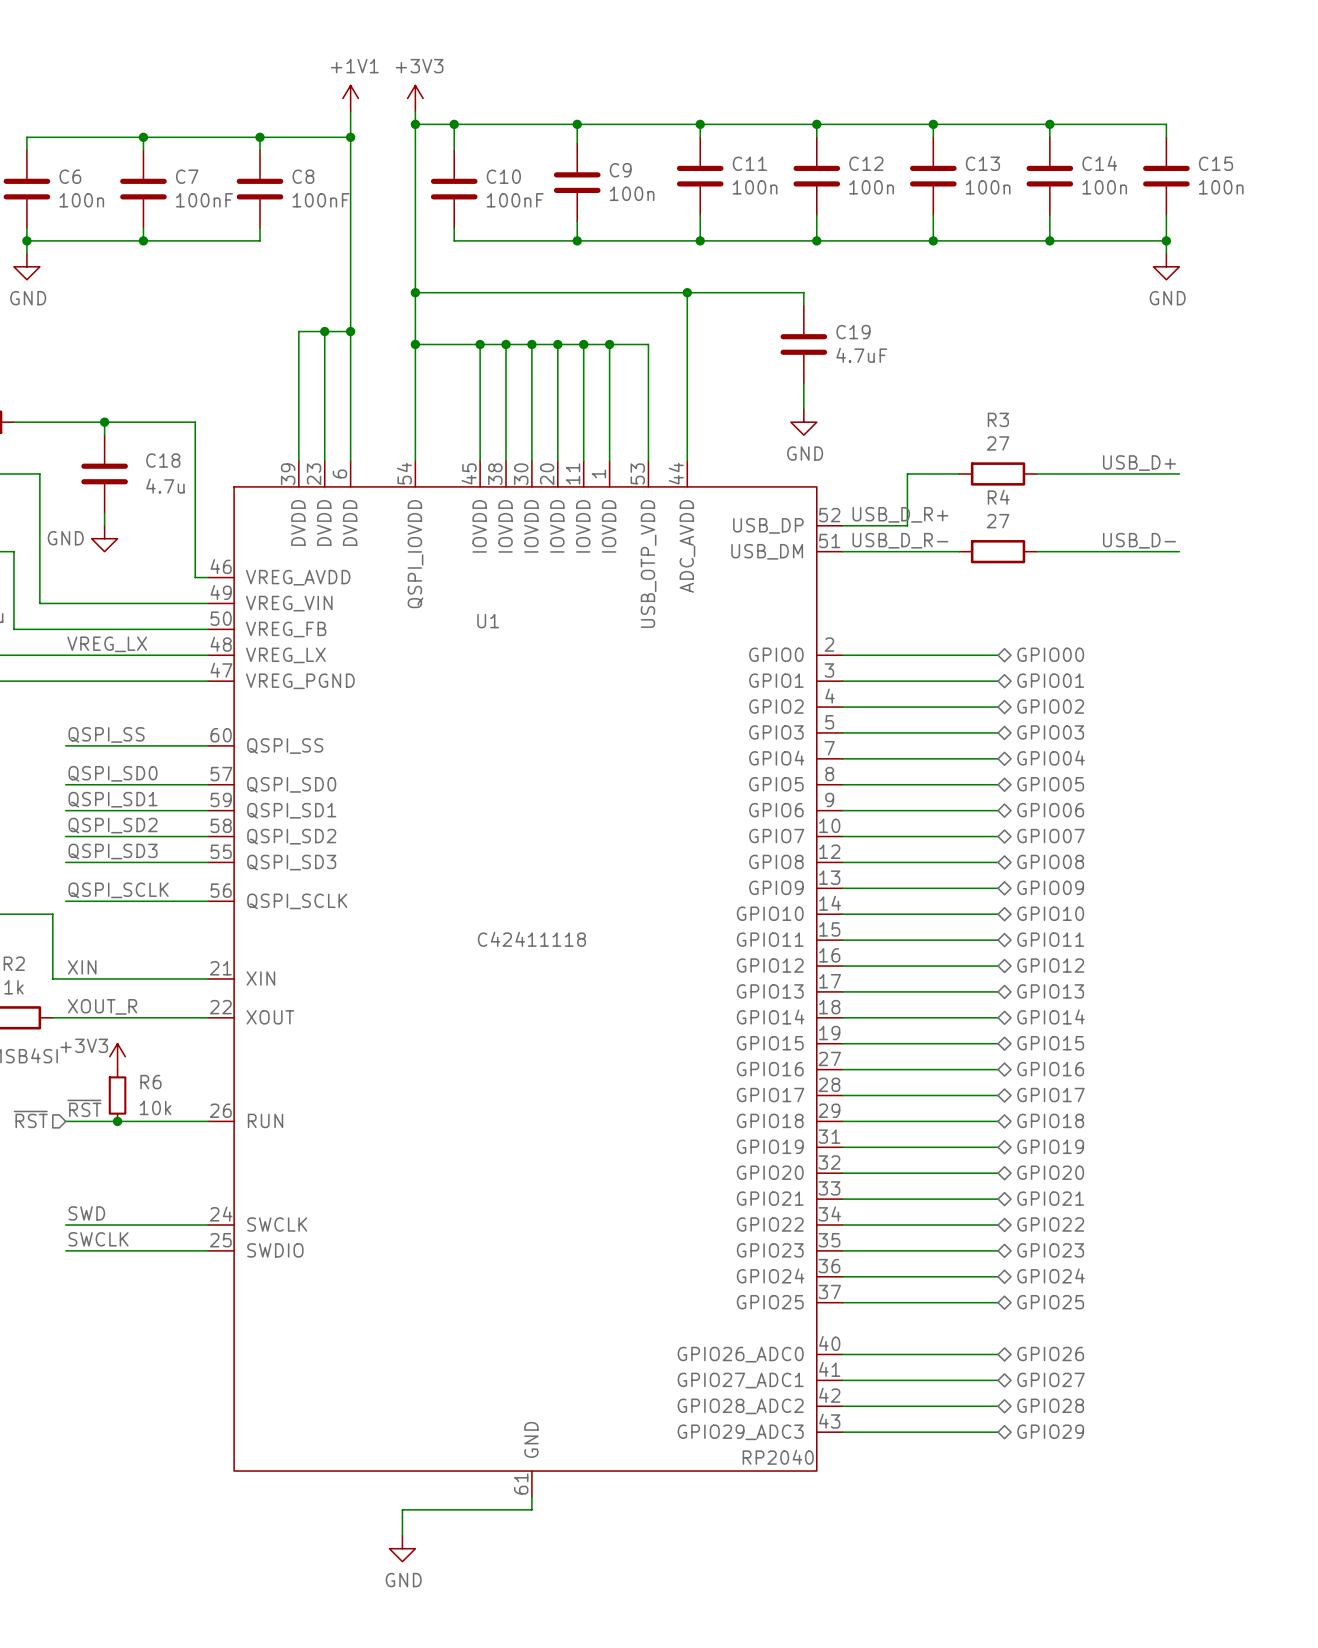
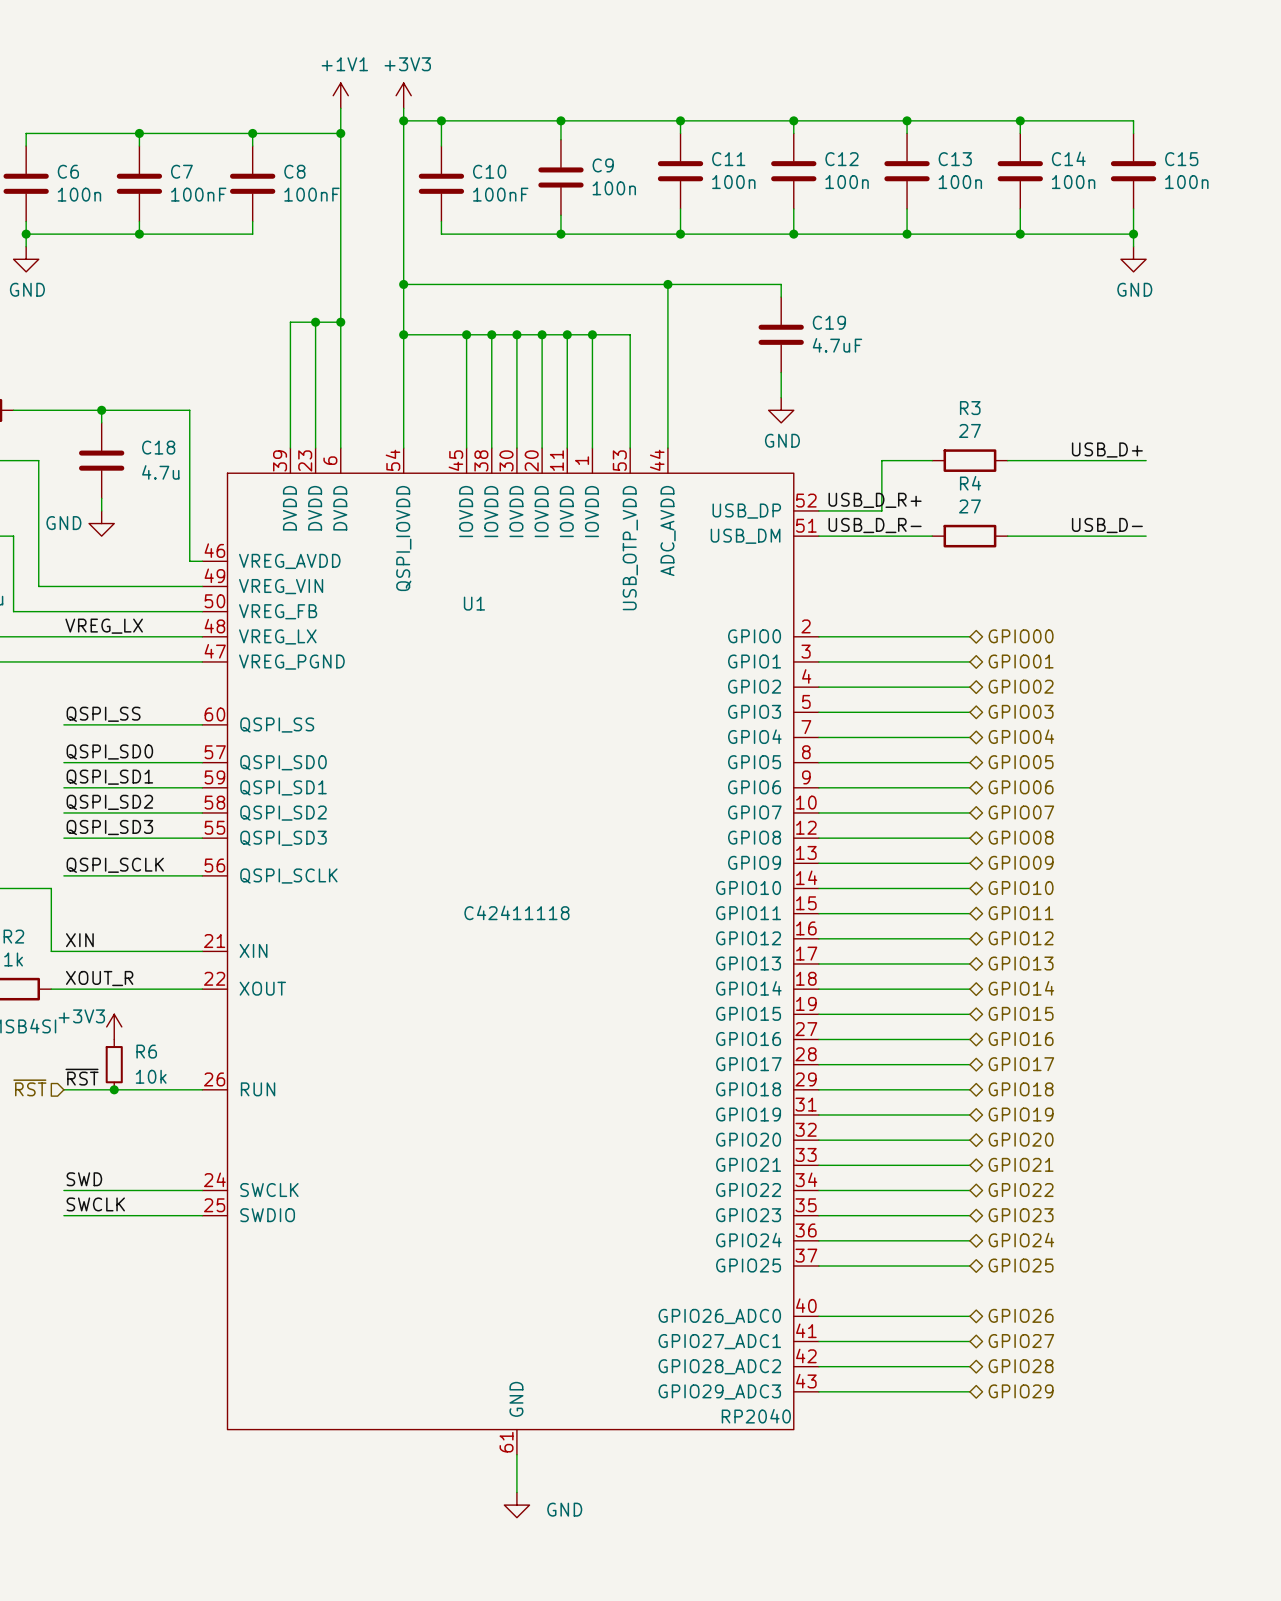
wire: (531, 1509) (402, 1509) (402, 1535) -> (516, 1467) (516, 1492)
power symbol position: GND (402, 1548) -> GND (516, 1505)
power symbol text position: GND (403, 1580) -> GND (564, 1509)

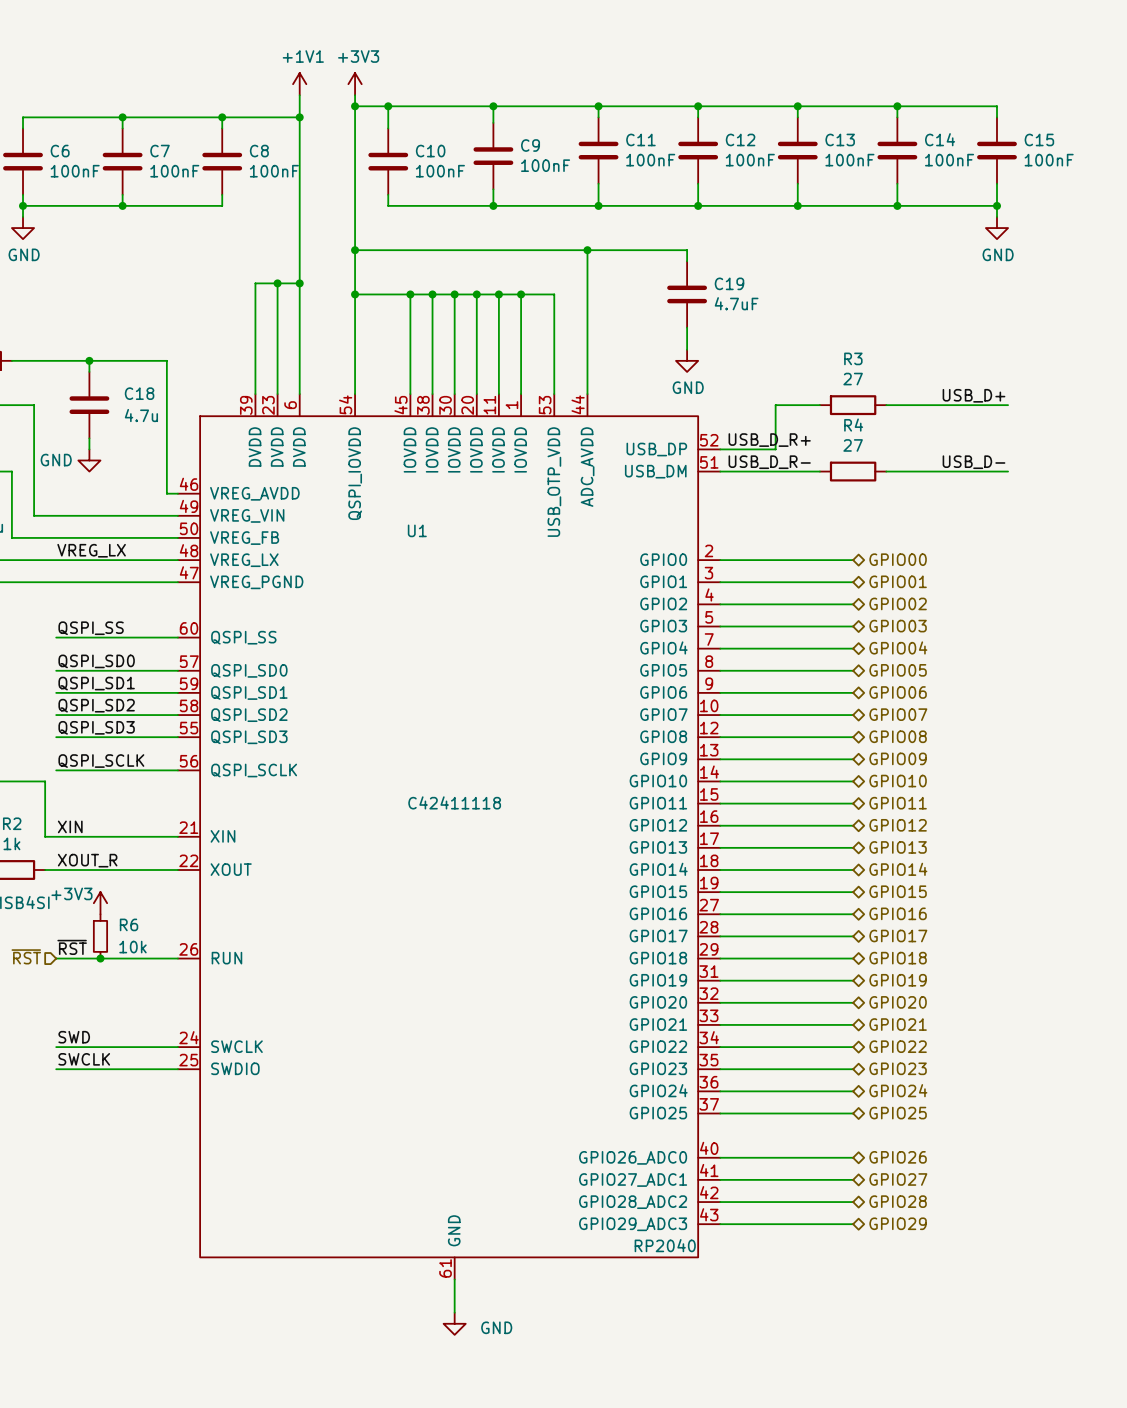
C11 value: 100n (733, 182) -> 100nF (650, 160)
C12 value: 100n (847, 182) -> 100nF (750, 160)
C13 value: 100n (960, 182) -> 100nF (849, 160)
C14 value: 100n (1073, 182) -> 100nF (949, 160)
C15 value: 100n (1186, 182) -> 100nF (1049, 160)
C9 value: 100n (614, 188) -> 100nF (545, 165)
C6 value: 100n (79, 194) -> 100nF (75, 171)

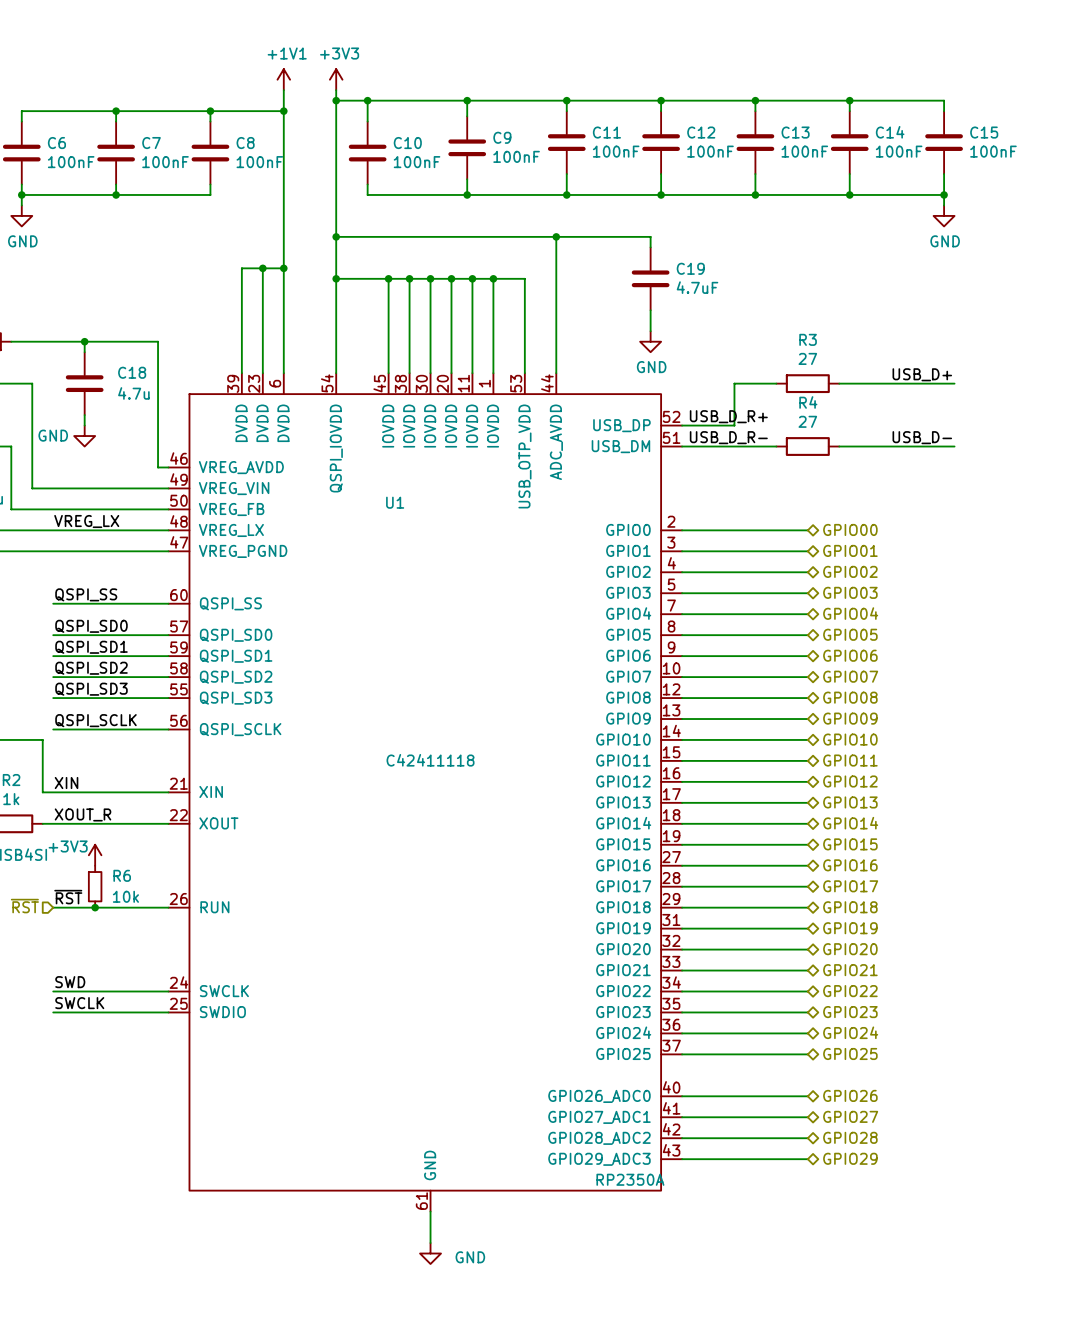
U1 value: RP2040 (665, 1245) -> RP2350A (630, 1179)

